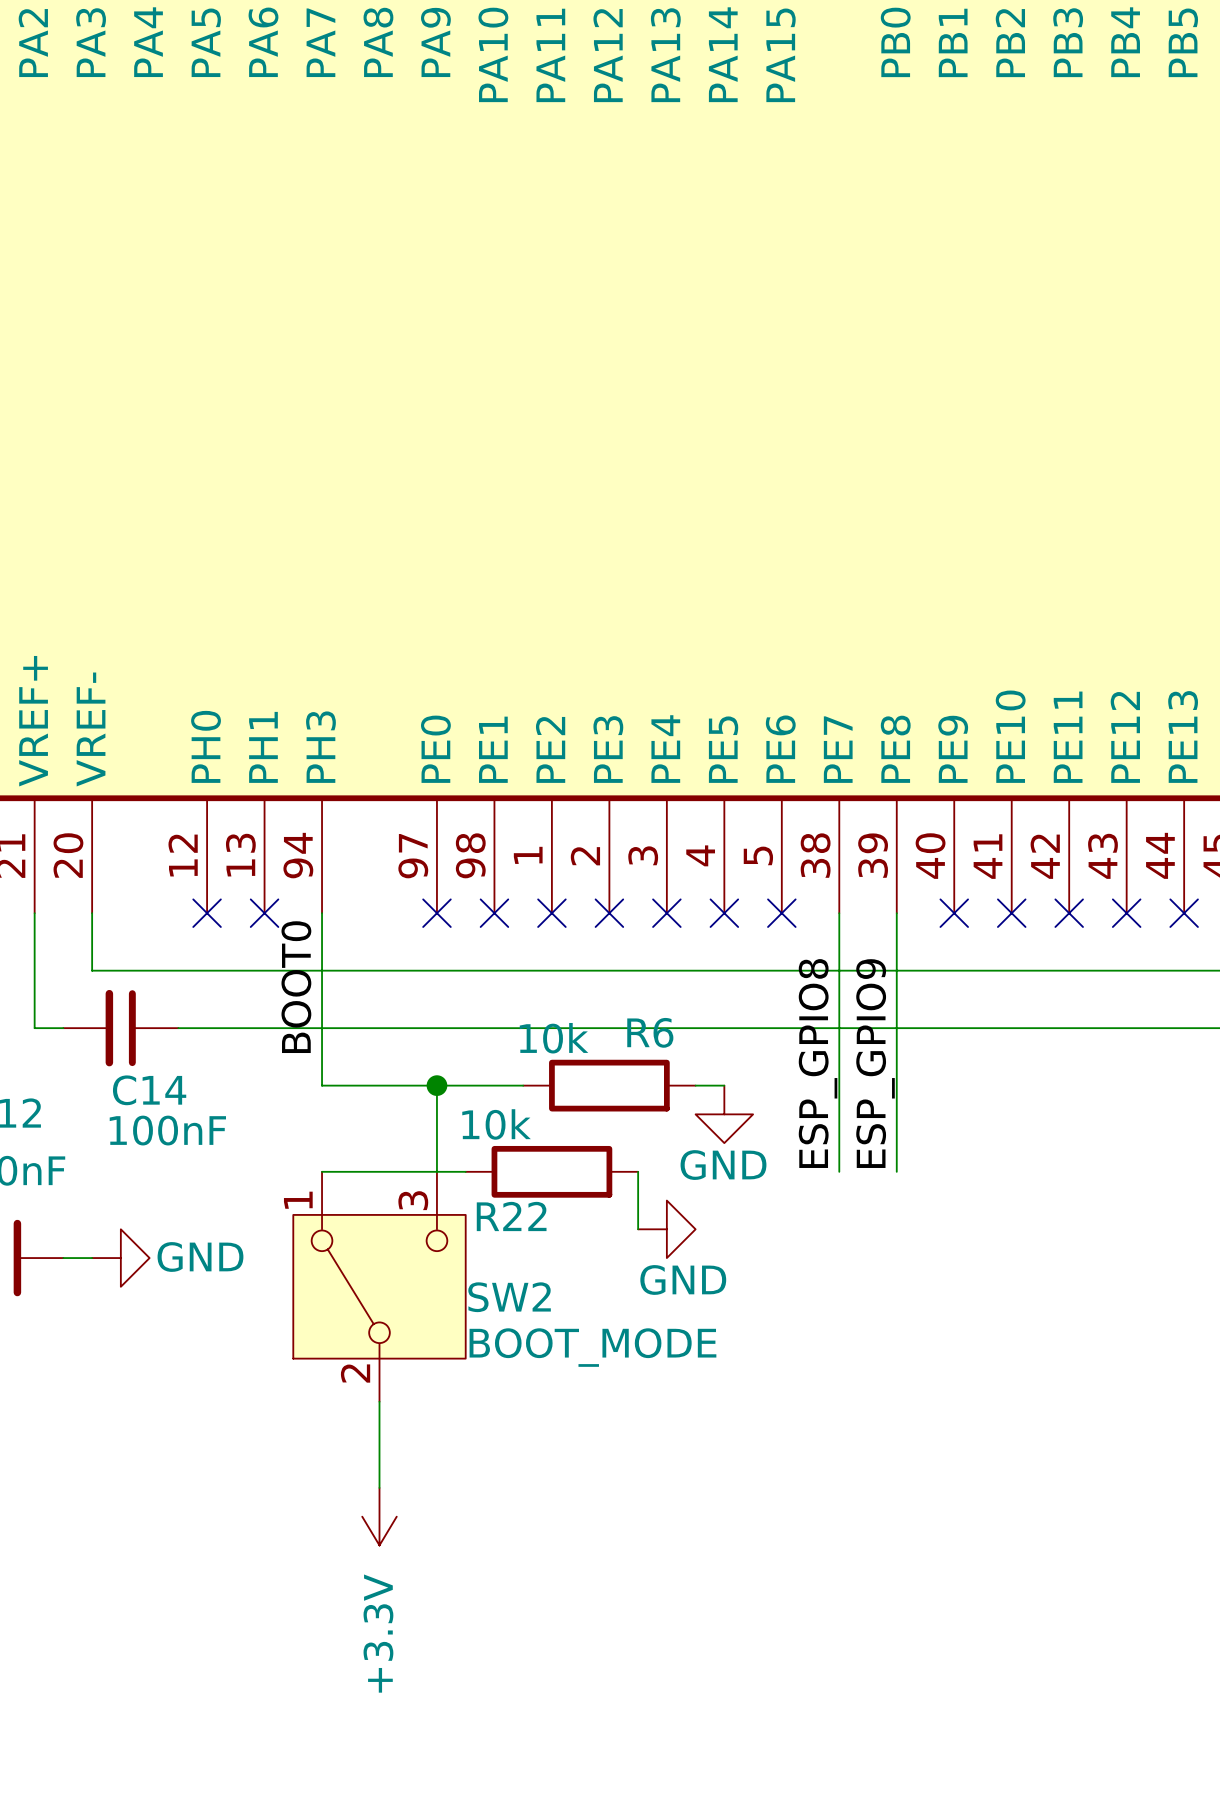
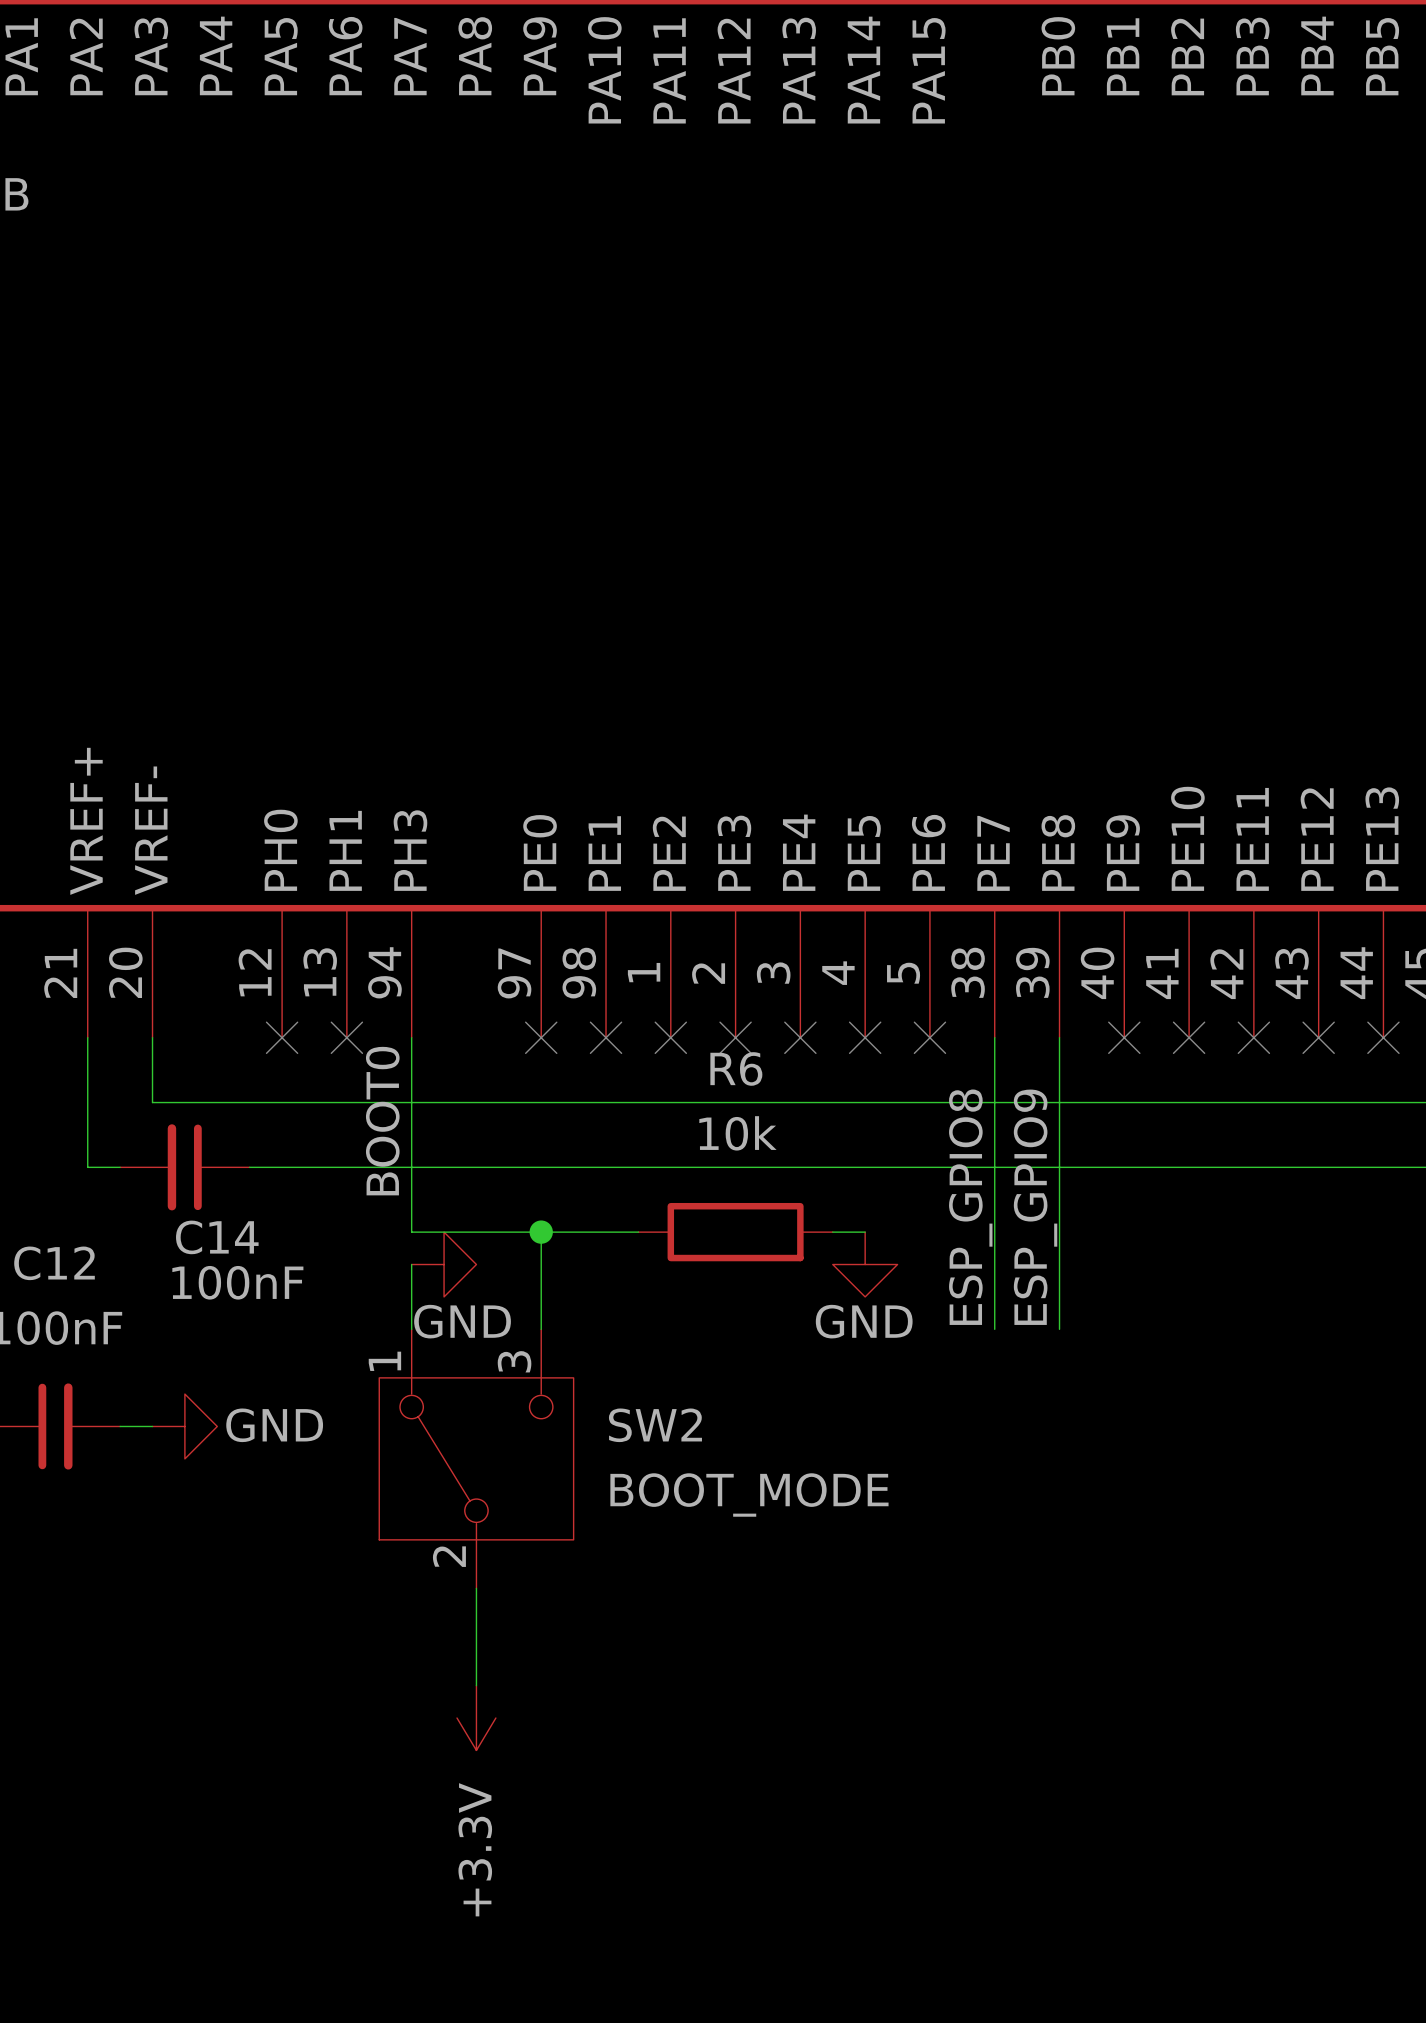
R6 name position: R6 (650, 1032) -> R6 (736, 1068)
R6 value position: 10k (554, 1038) -> 10k (737, 1133)
wire: (322, 1171) (465, 1171) -> (411, 1329) (411, 1264)
R22: 10k (551, 1171) -> none
wire: (638, 1171) (638, 1229) -> none
power symbol position: GND (666, 1229) -> GND (444, 1264)
SW2 name position: SW2 (509, 1297) -> SW2 (655, 1425)
SW2 value position: BOOT_MODE (592, 1347) -> BOOT_MODE (749, 1495)

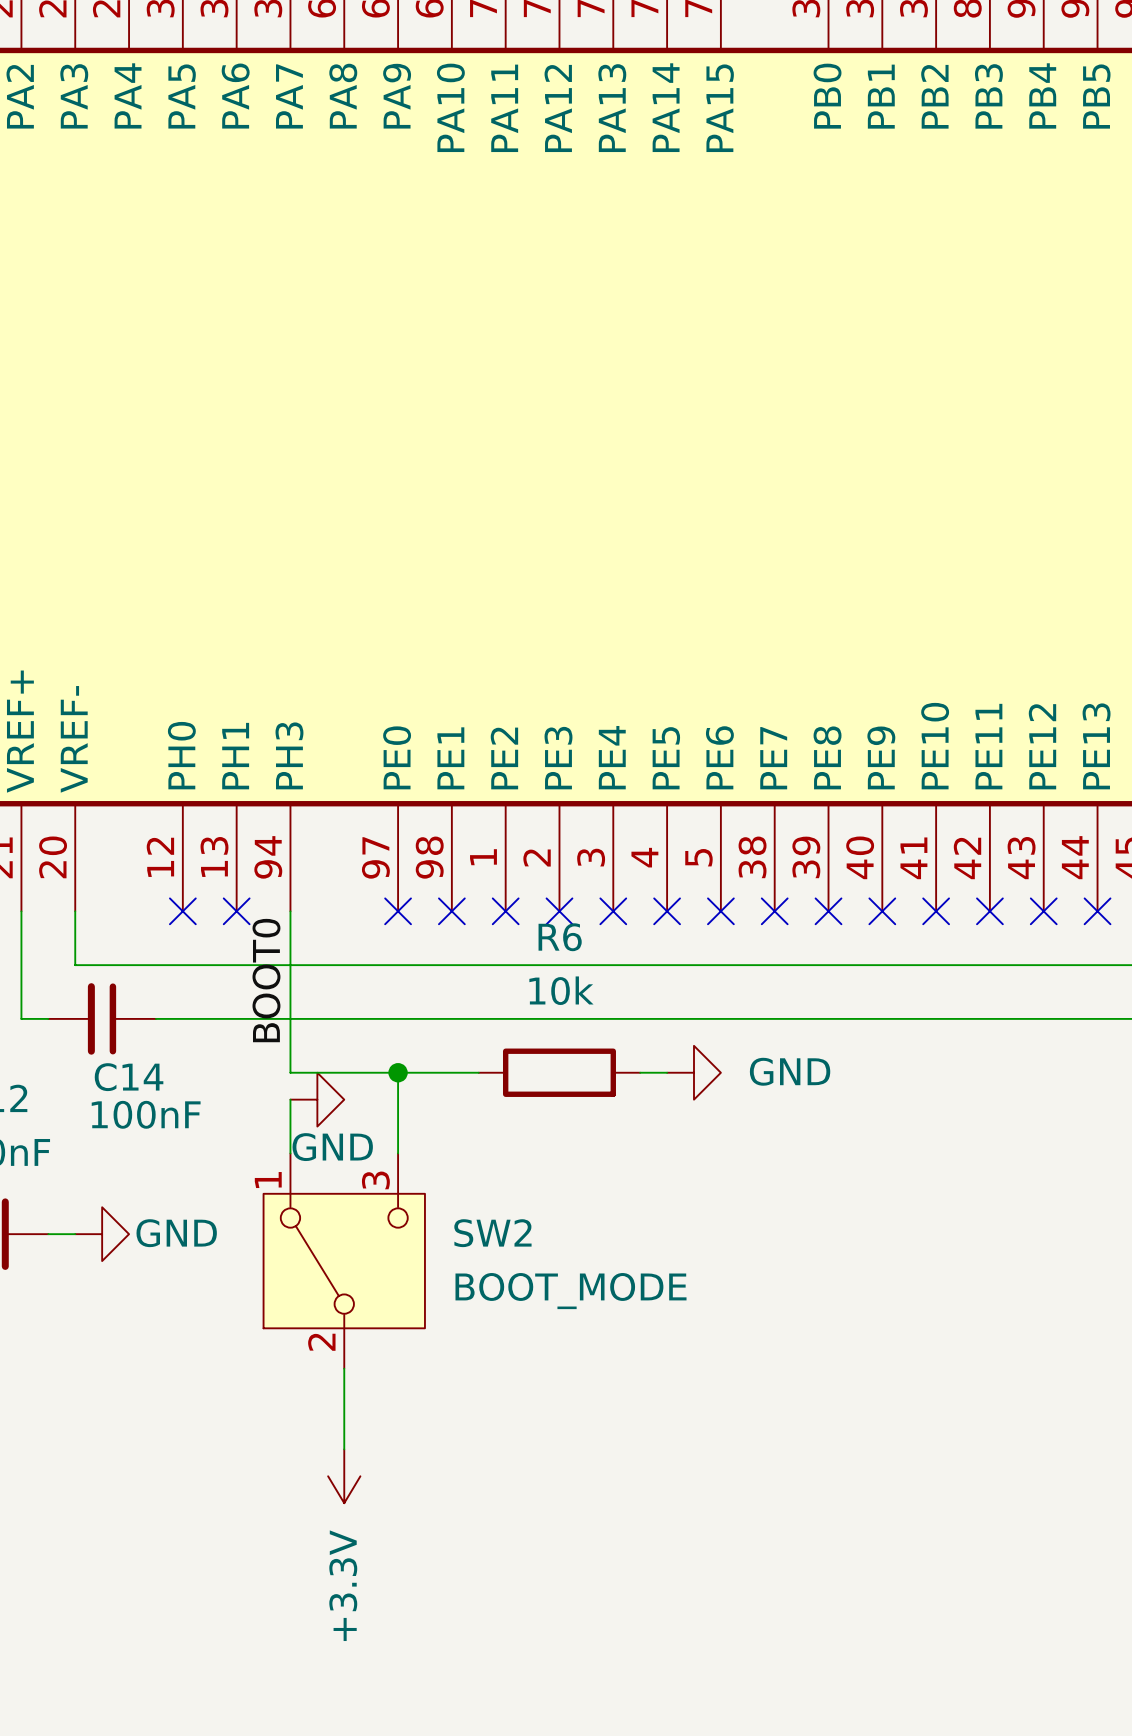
wire: (994, 1037) (994, 1329) -> none
no-connect mark: none -> (774, 911)
wire: (1059, 1037) (1059, 1329) -> none
no-connect mark: none -> (828, 911)
label: ESP_GPIO8 (970, 1207) -> none
label: ESP_GPIO9 (1035, 1207) -> none
power symbol rotation: 0° (865, 1264) -> 90° counterclockwise (693, 1072)
power symbol position: GND (865, 1264) -> GND (693, 1072)
power symbol text position: GND (864, 1321) -> GND (790, 1071)

